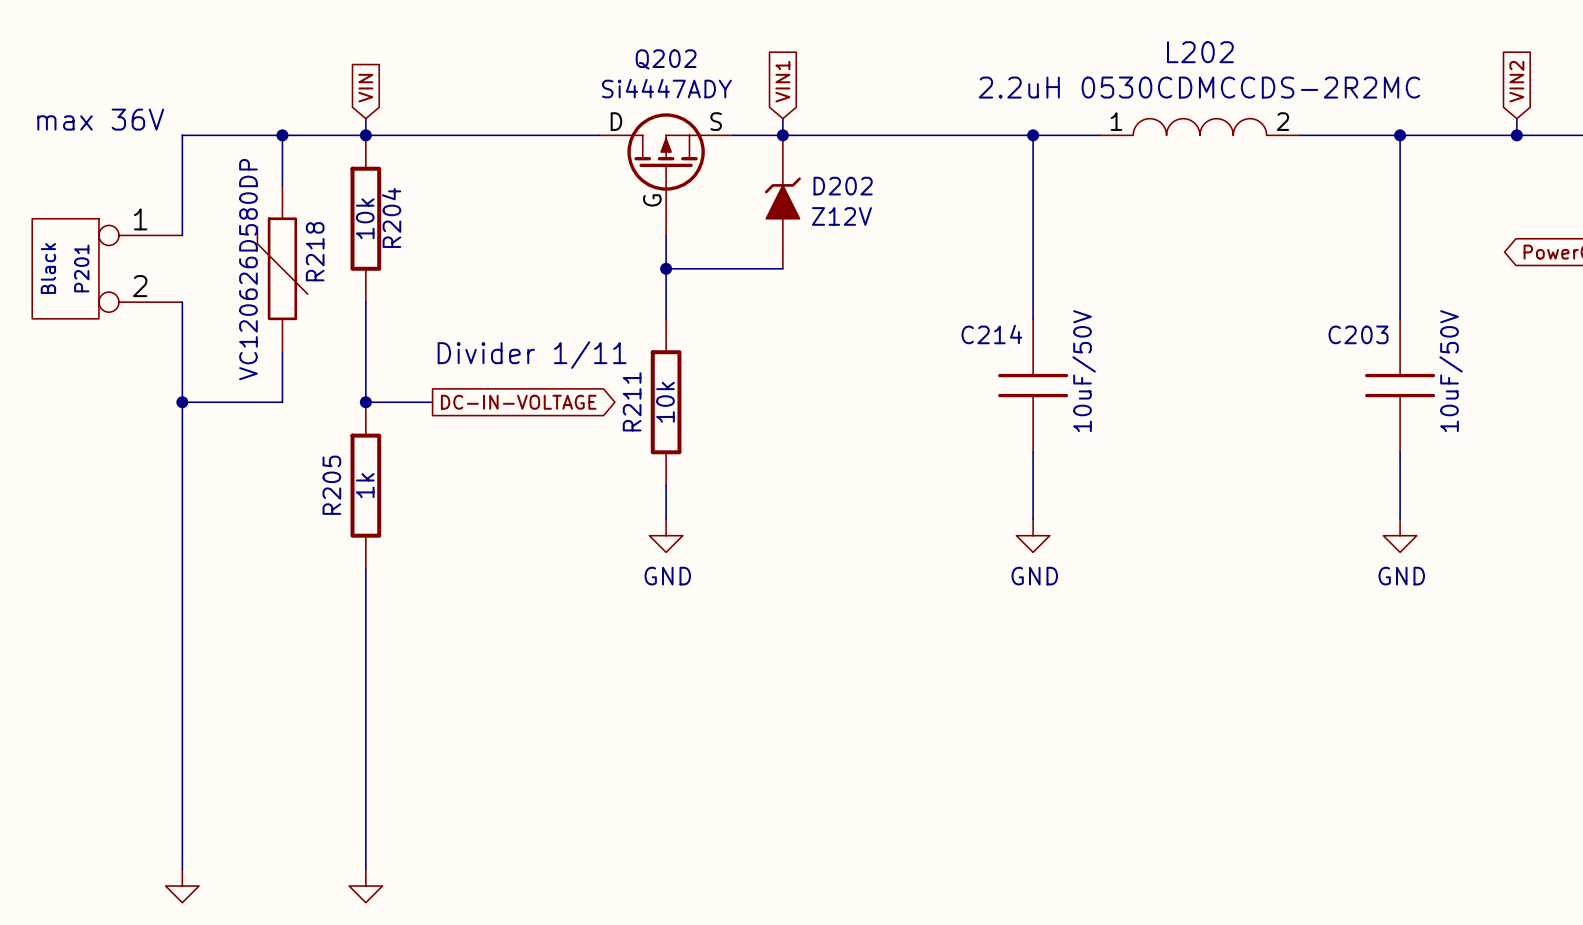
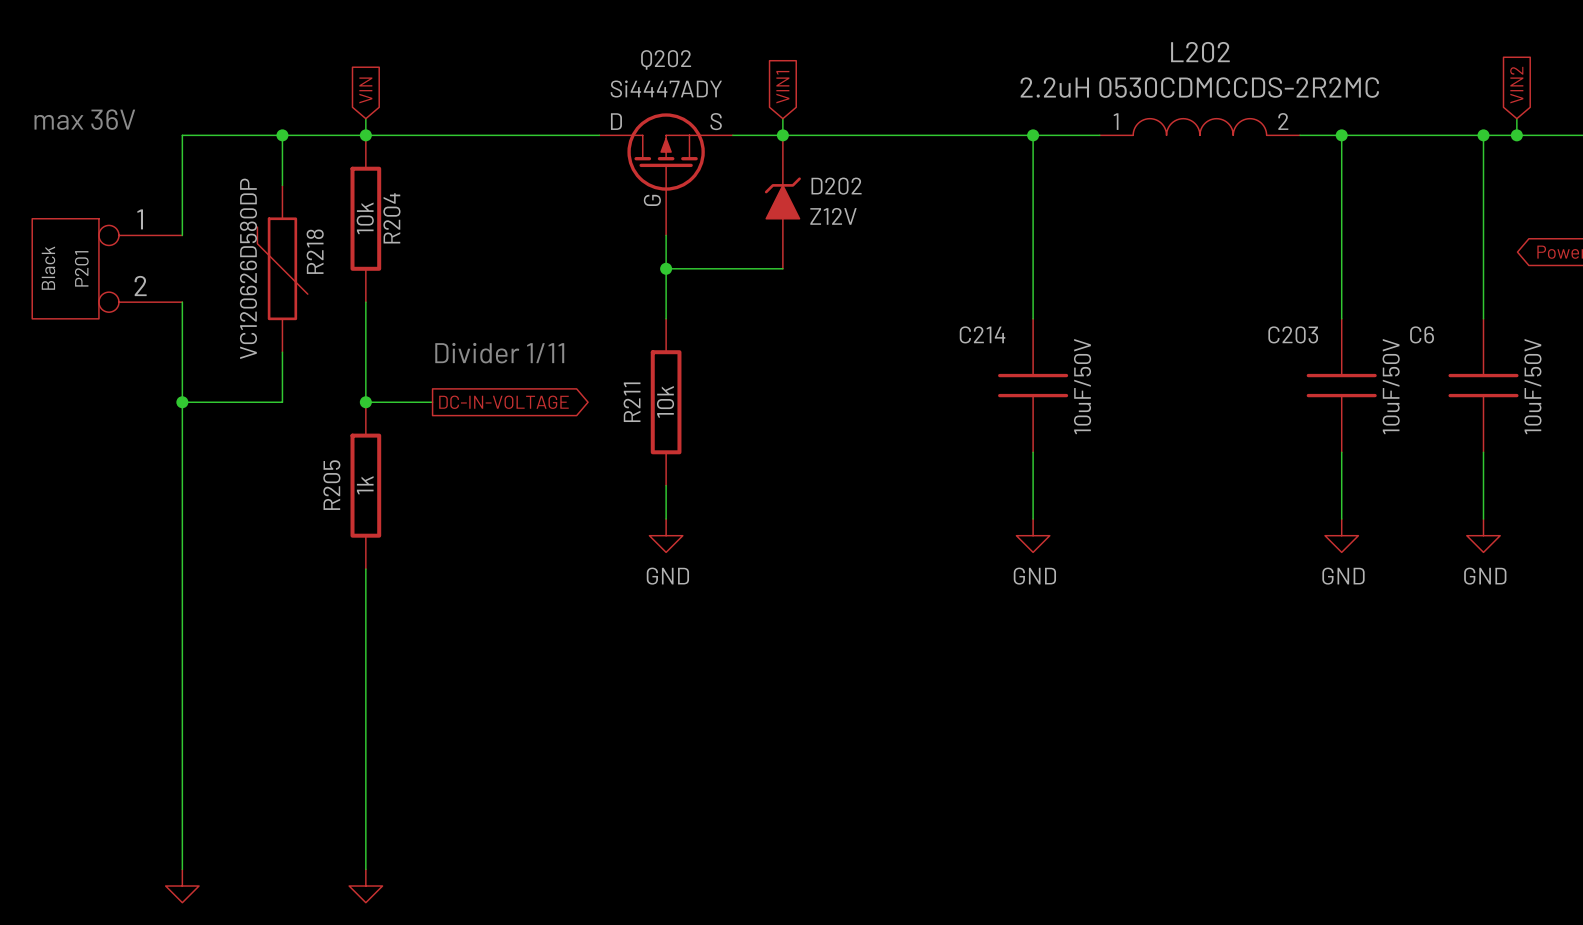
junction: none -> (1341, 135)
wire: (1400, 135) (1400, 318) -> (1341, 135) (1341, 318)
junction: (1400, 135) -> none
wire: none -> (1483, 135) (1483, 318)
junction: none -> (1483, 135)
C203 position: (1400, 385) -> (1341, 385)
C6: none -> 10uF/50V (1483, 385)
wire: (1400, 452) (1400, 519) -> (1341, 452) (1341, 519)
wire: none -> (1483, 452) (1483, 519)
power symbol: none -> GND (1341, 535)
power symbol: GND (1400, 535) -> none
power symbol: none -> GND (1483, 535)

